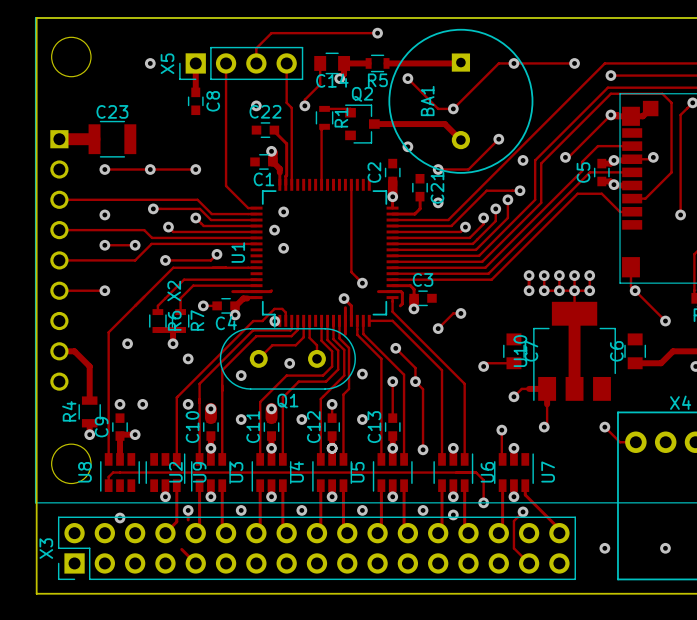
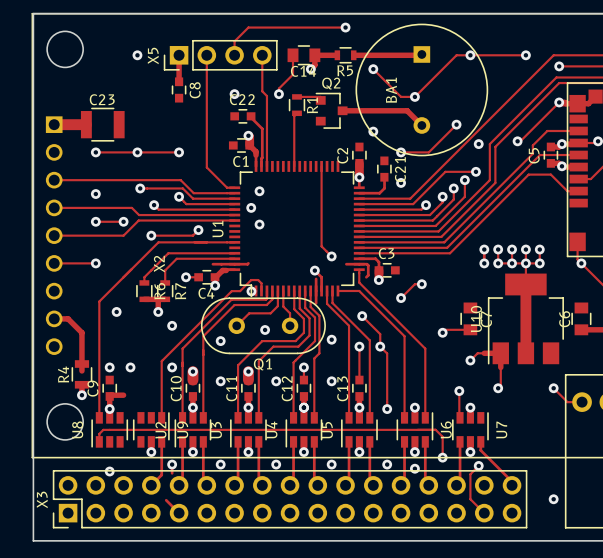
track: none -> (81, 364) (81, 370)
via position: (135, 434) -> (109, 409)

